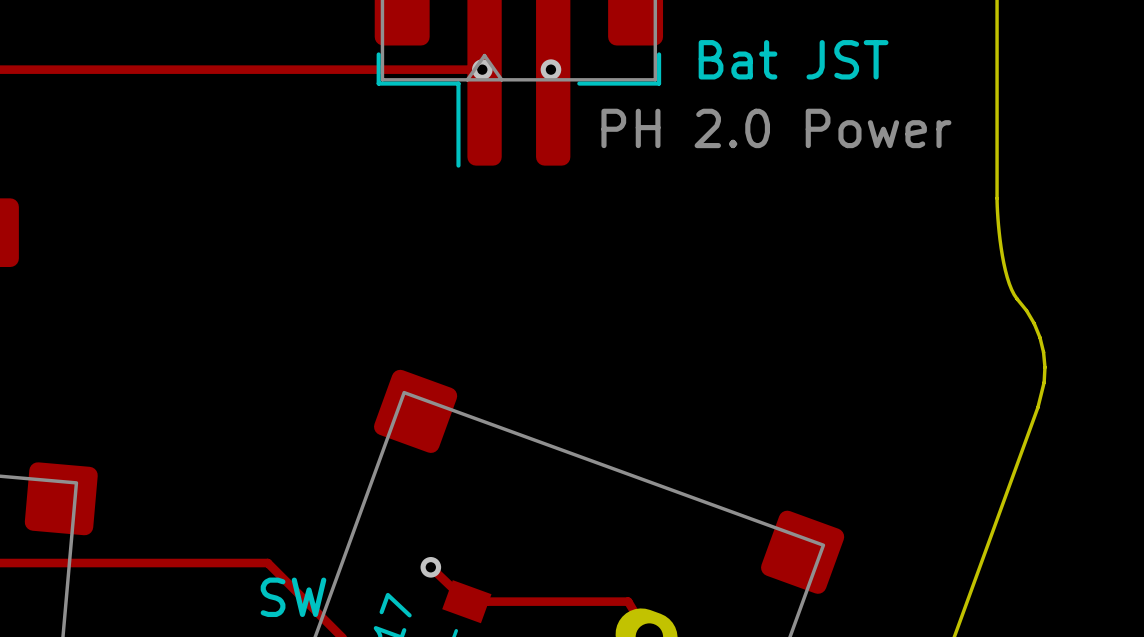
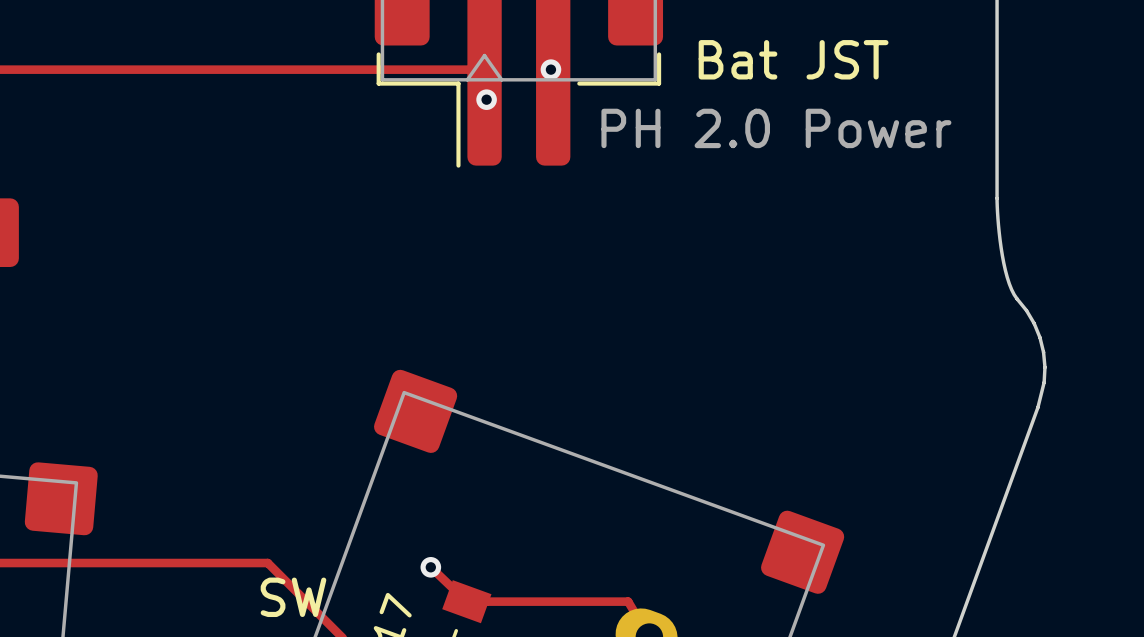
via position: (482, 69) -> (486, 99)

